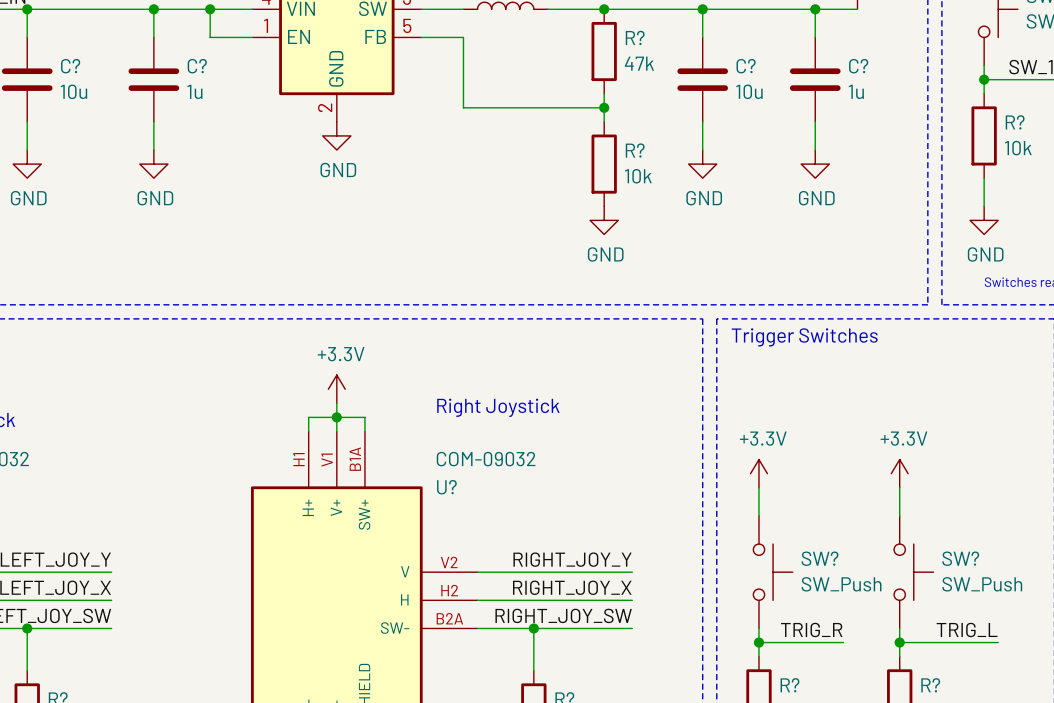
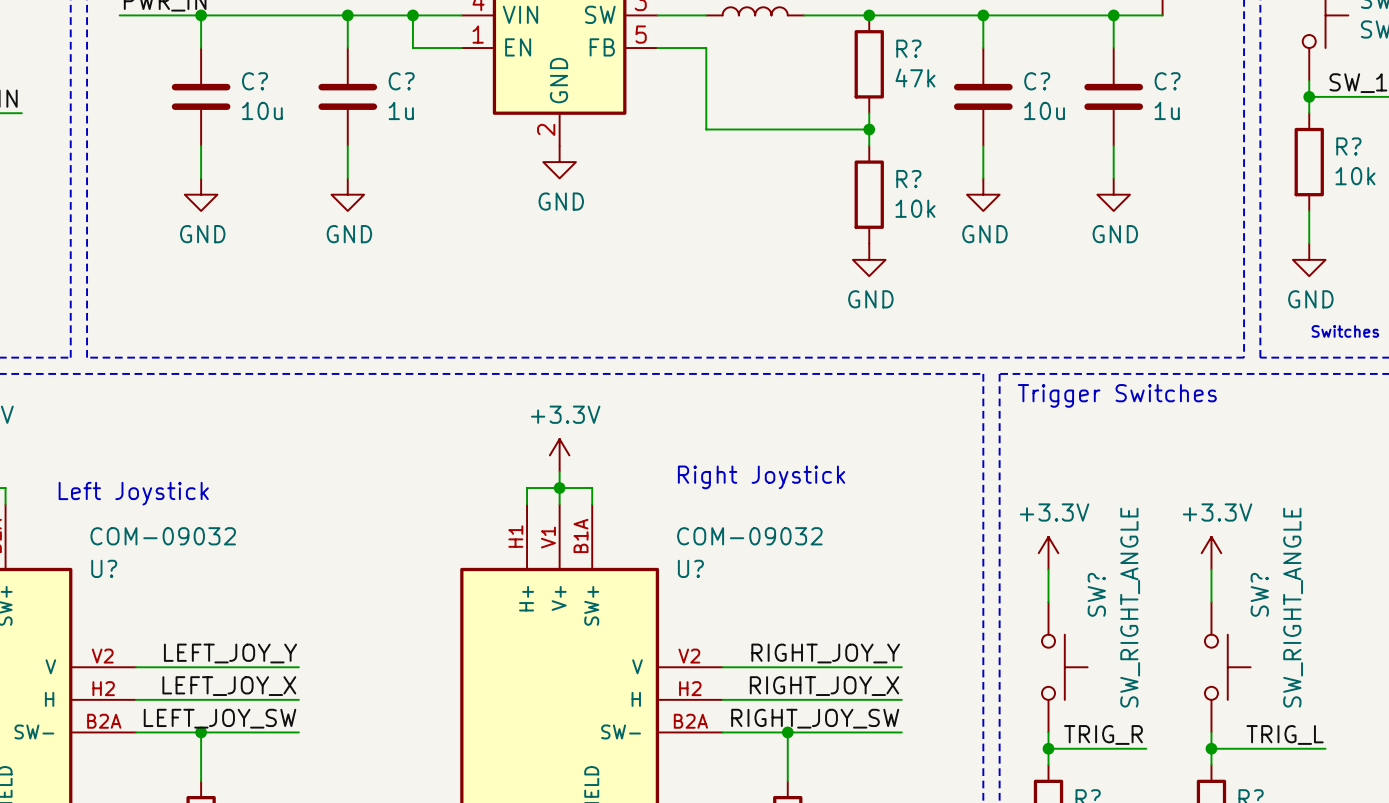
SW? name rotation: 0° (820, 558) -> 90° counterclockwise (1096, 594)
SW? name position: SW? (820, 558) -> SW? (1096, 594)
SW? name rotation: 0° (960, 558) -> 90° counterclockwise (1259, 594)
SW? name position: SW? (960, 558) -> SW? (1259, 594)
SW? value: SW_Push (841, 584) -> SW_RIGHT_ANGLE (1130, 607)
SW? value: SW_Push (982, 584) -> SW_RIGHT_ANGLE (1293, 607)

